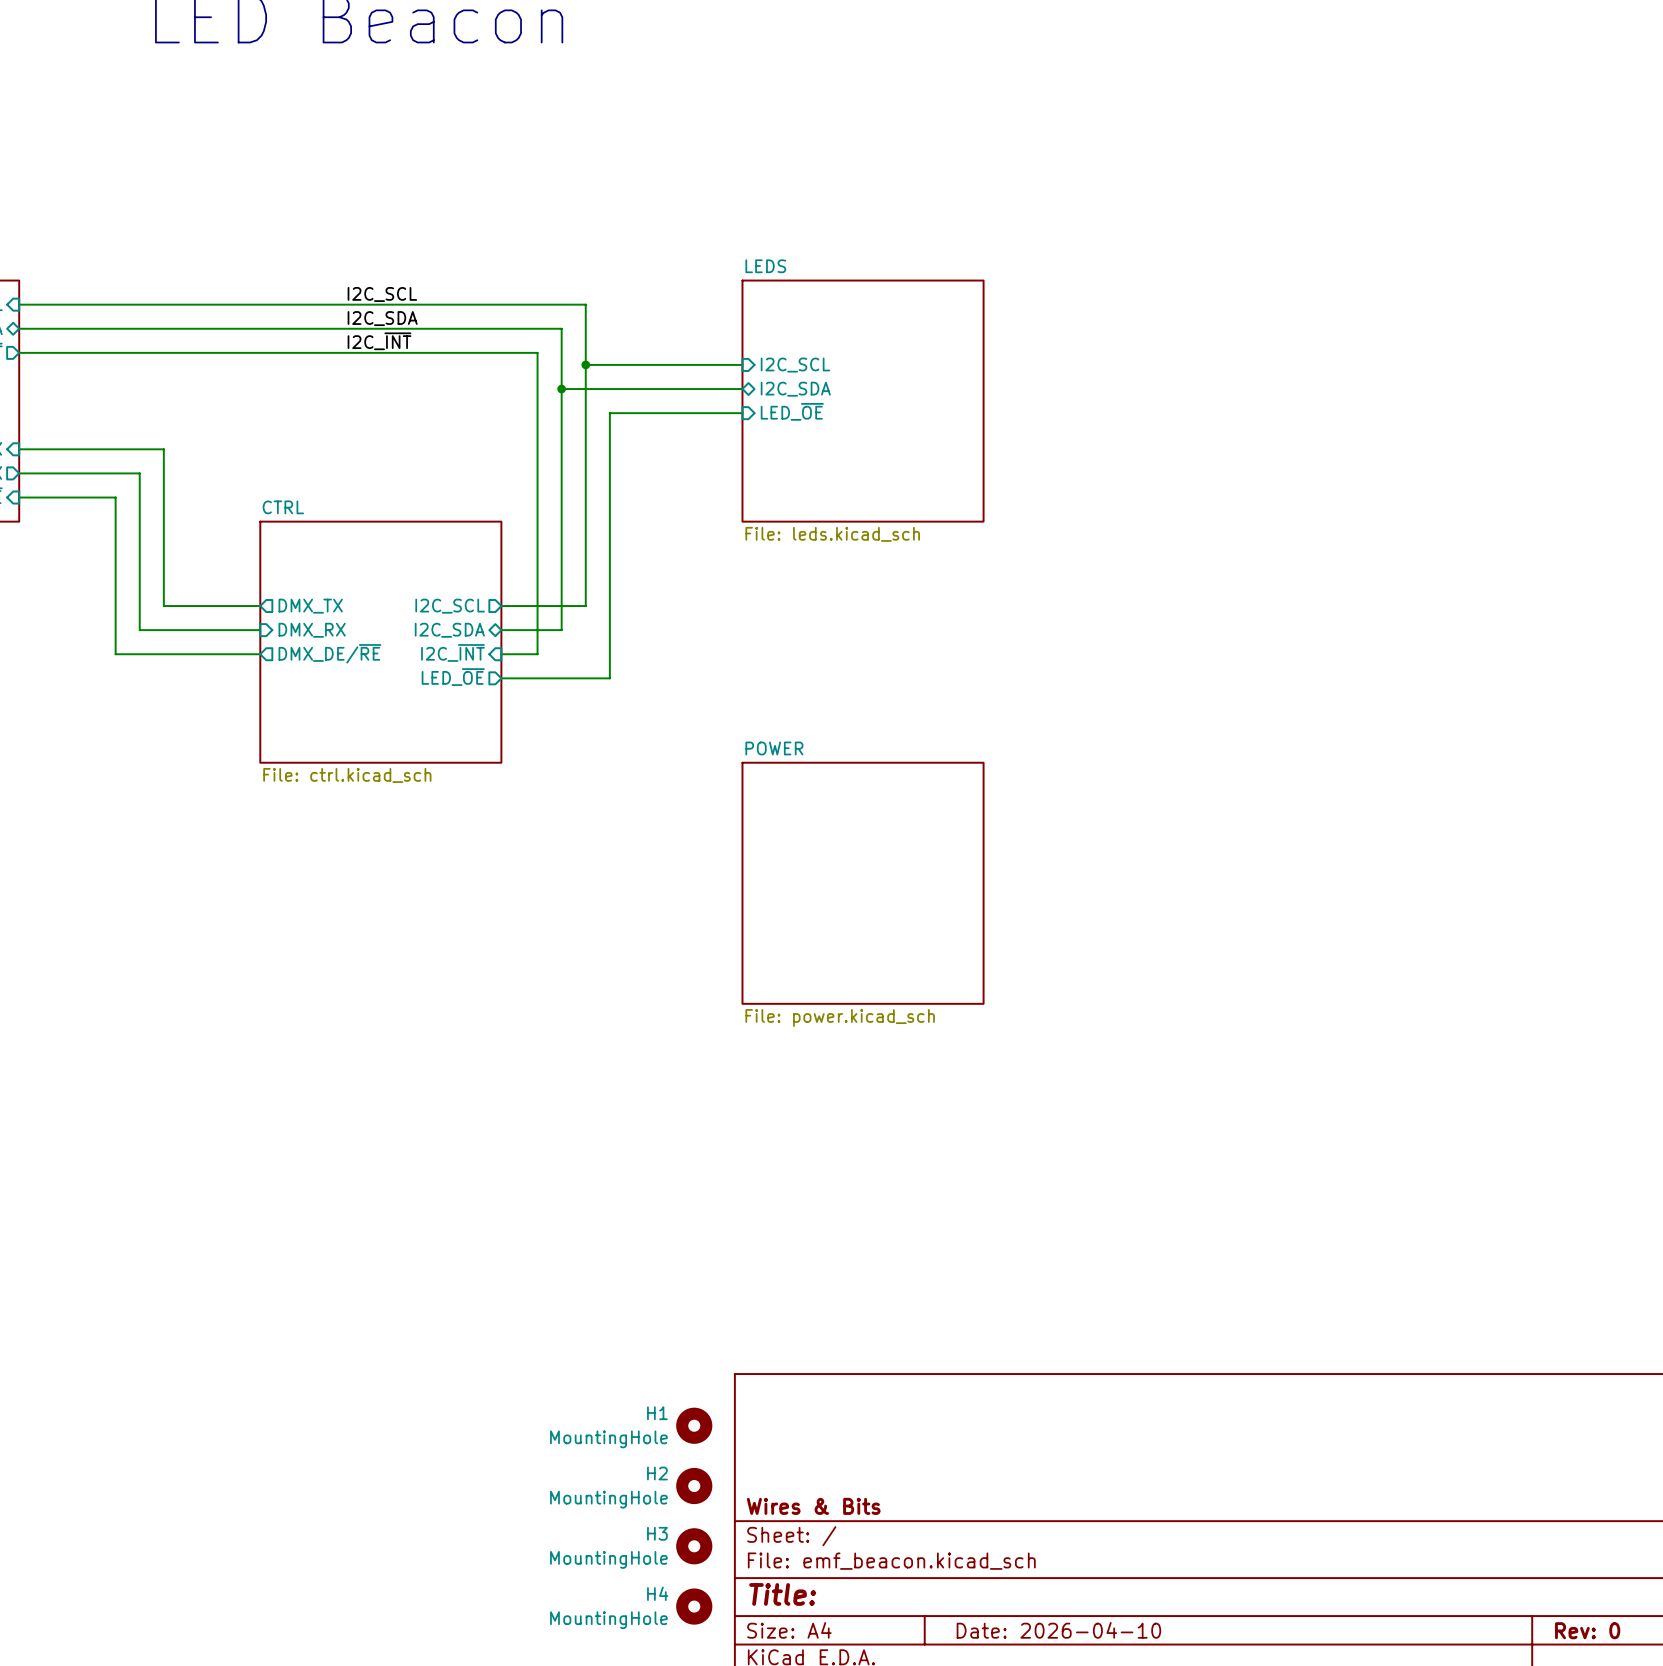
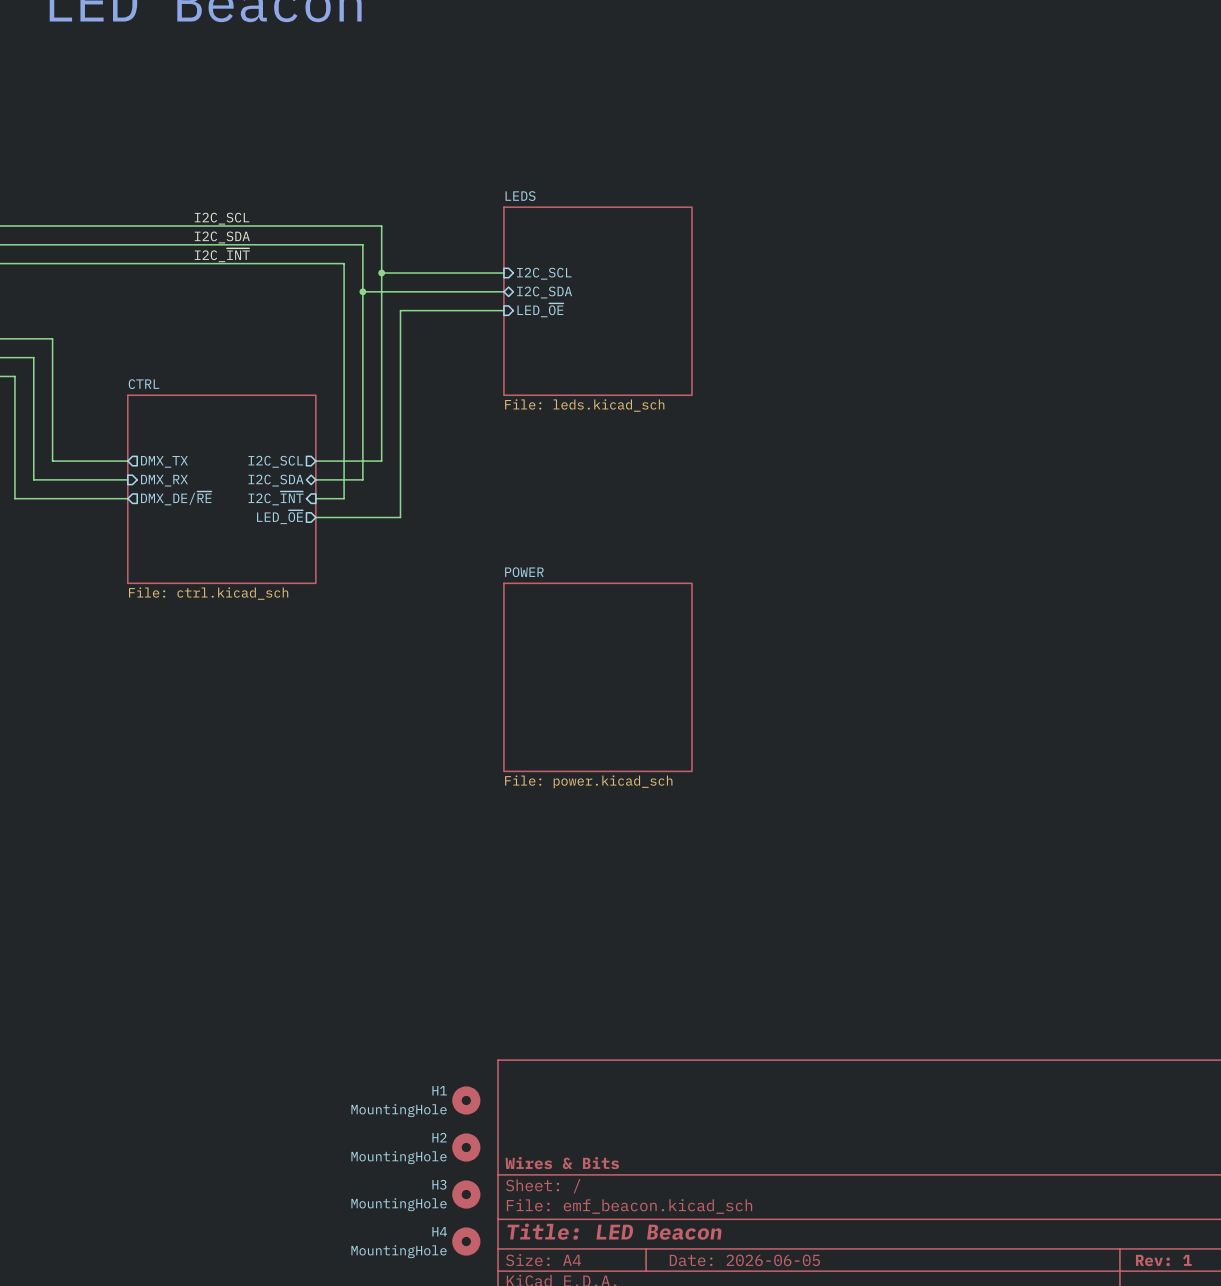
title block: Title: (782, 1594) -> Title: LED Beacon (614, 1231)
title block: Date: 2026-04-10 (1058, 1630) -> Date: 2026-06-05 (744, 1260)
title block: Rev: 0 (1587, 1630) -> Rev: 1 (1163, 1260)

